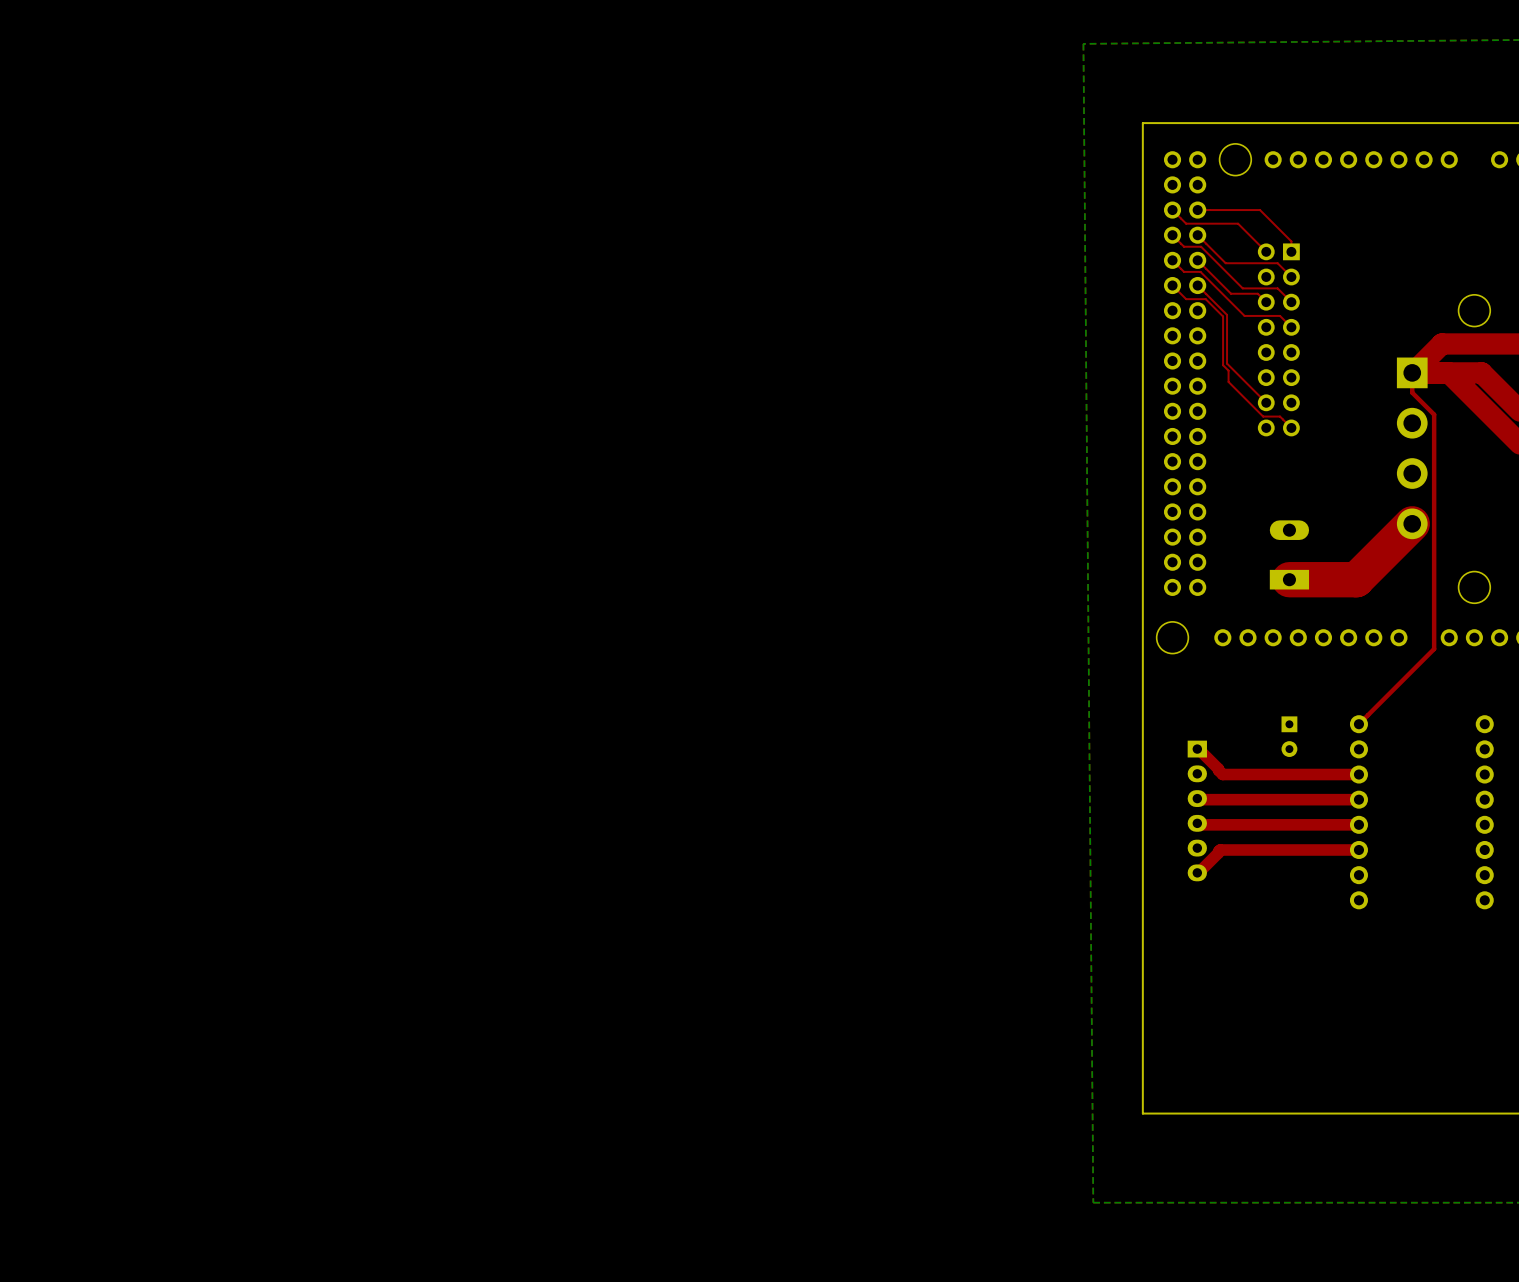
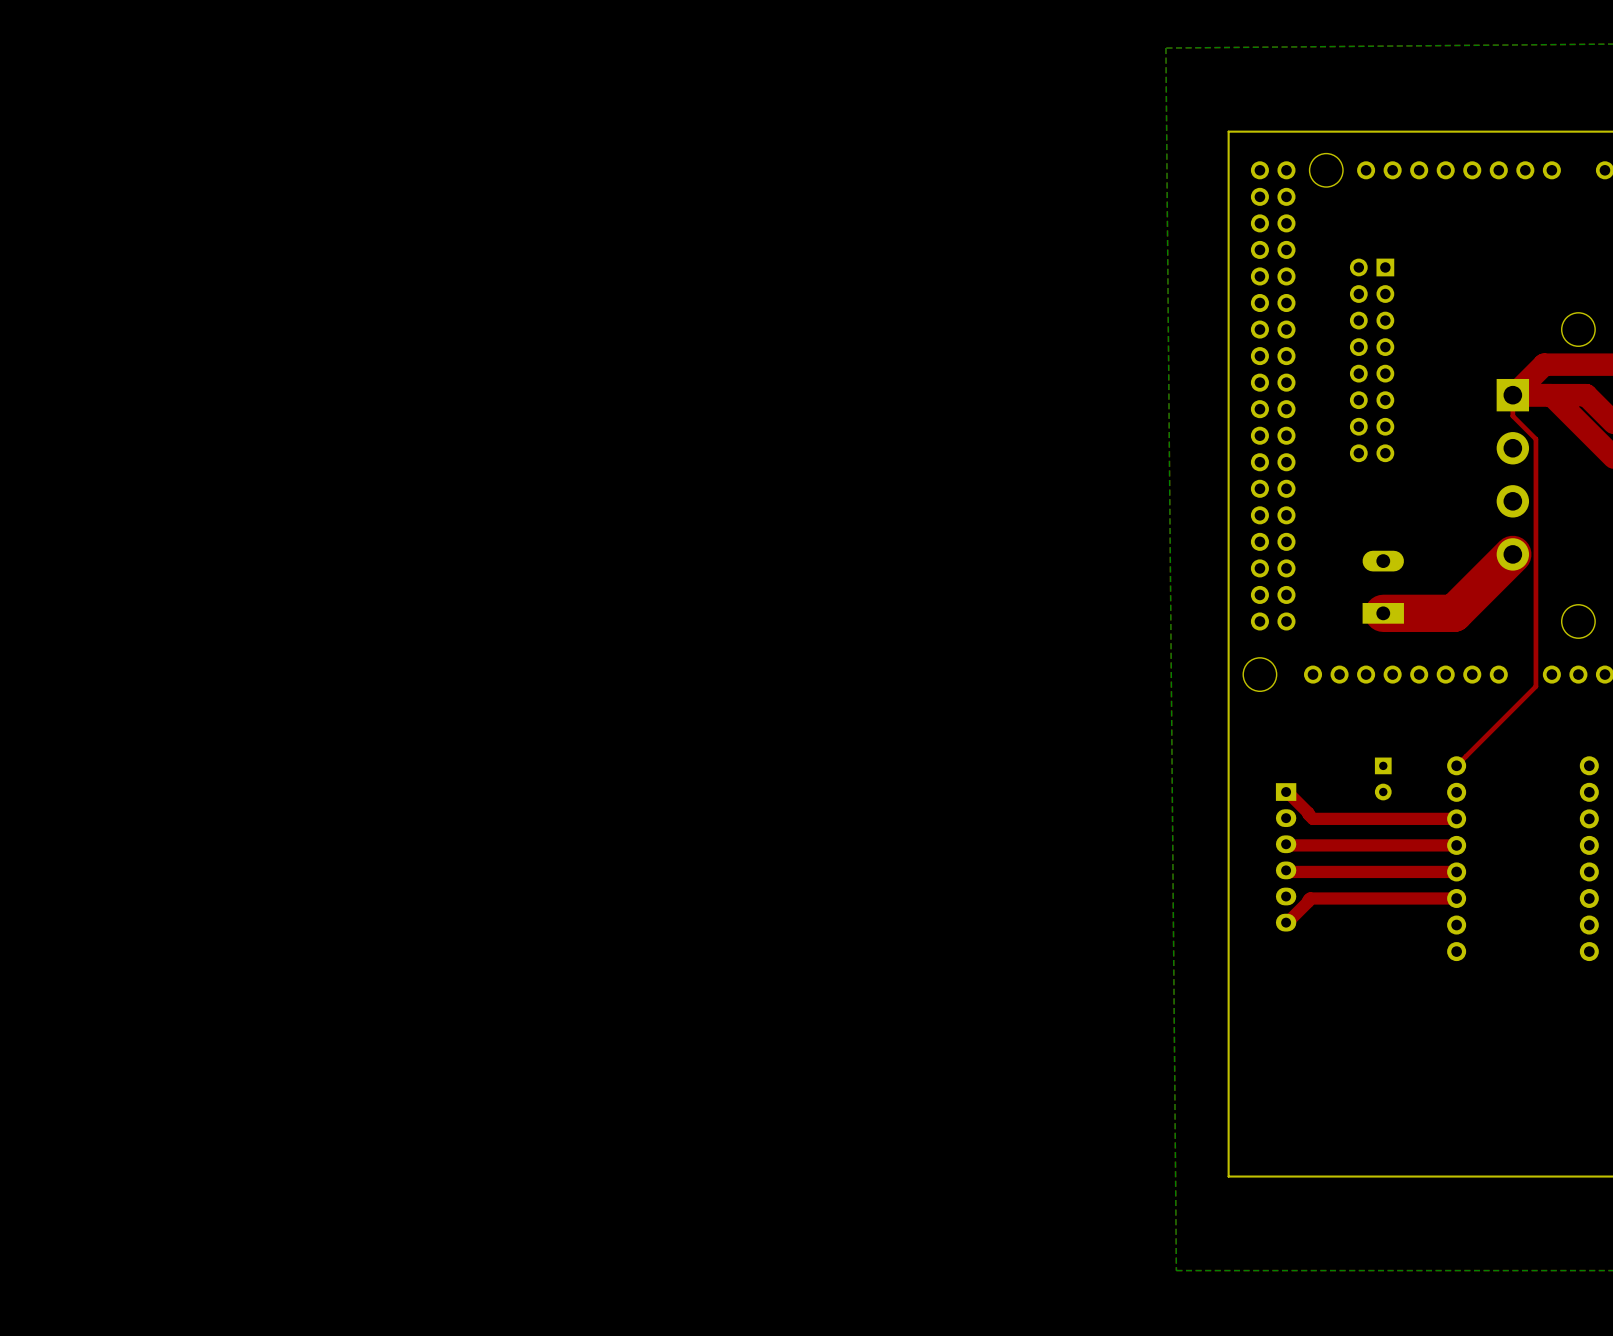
top track: (1172, 210) (1186, 223) (1238, 223) (1266, 251) -> none
top track: (1197, 210) (1260, 210) (1291, 241) (1291, 251) -> none
top track: (1172, 235) (1184, 246) (1201, 246) (1242, 288) (1277, 288) (1291, 302) -> none
top track: (1197, 235) (1225, 263) (1277, 263) (1291, 277) -> none
top track: (1172, 260) (1184, 271) (1200, 271) (1244, 315) (1280, 315) (1291, 327) -> none
top track: (1197, 260) (1231, 293) (1257, 293) (1266, 302) -> none
top track: (1172, 285) (1186, 299) (1205, 299) (1223, 316) (1223, 365) (1228, 370) (1228, 381) (1263, 416) (1280, 416) (1291, 427) -> none
top track: (1197, 285) (1227, 314) (1227, 363) (1266, 402) -> none

